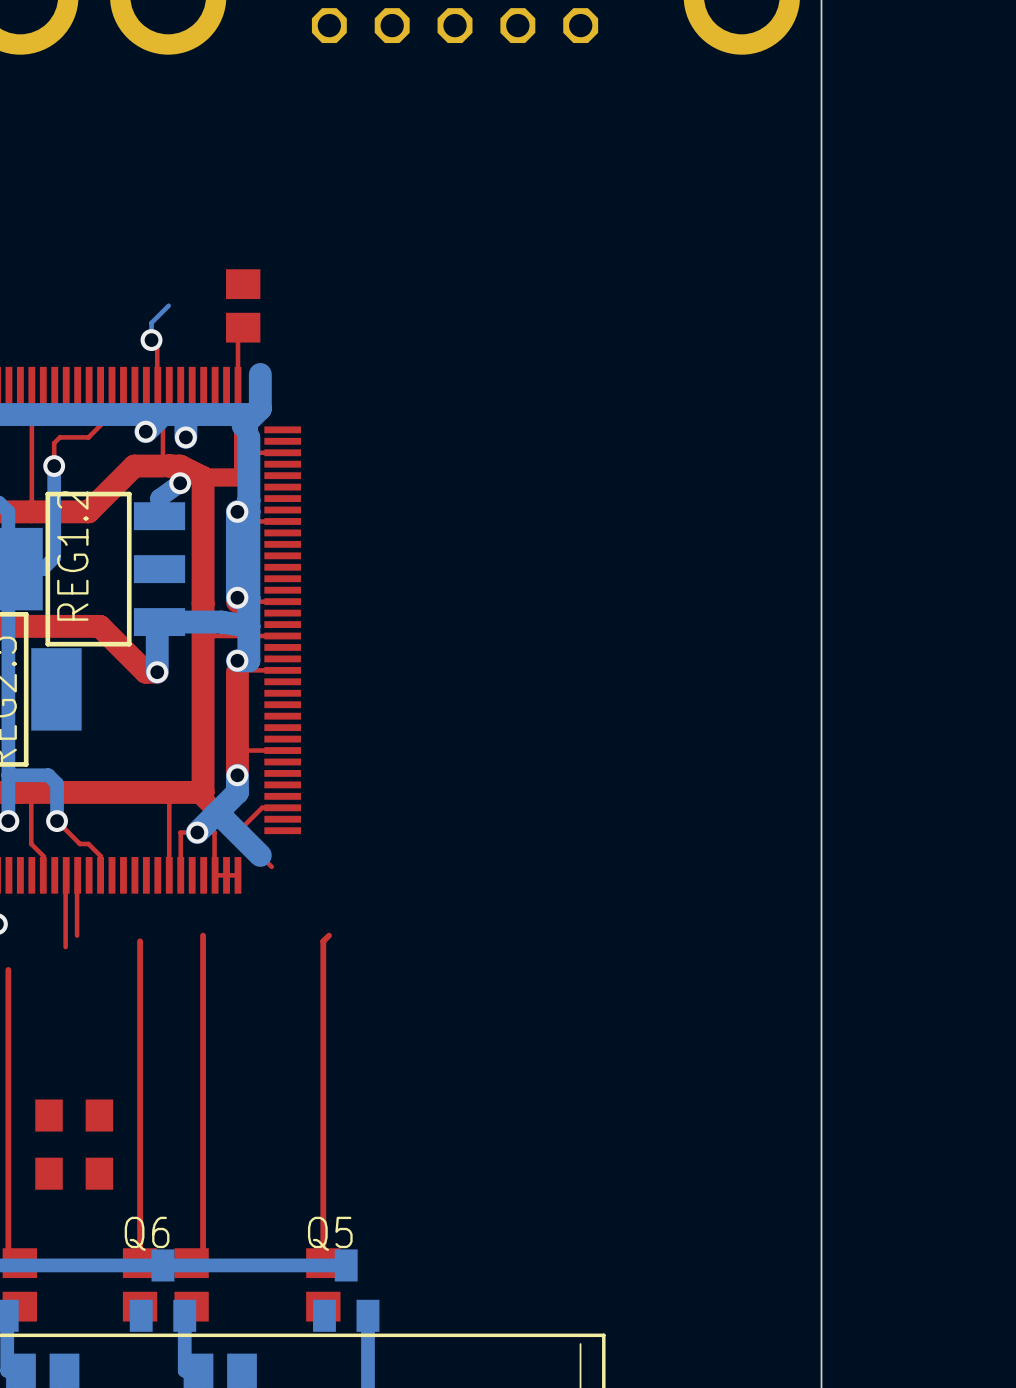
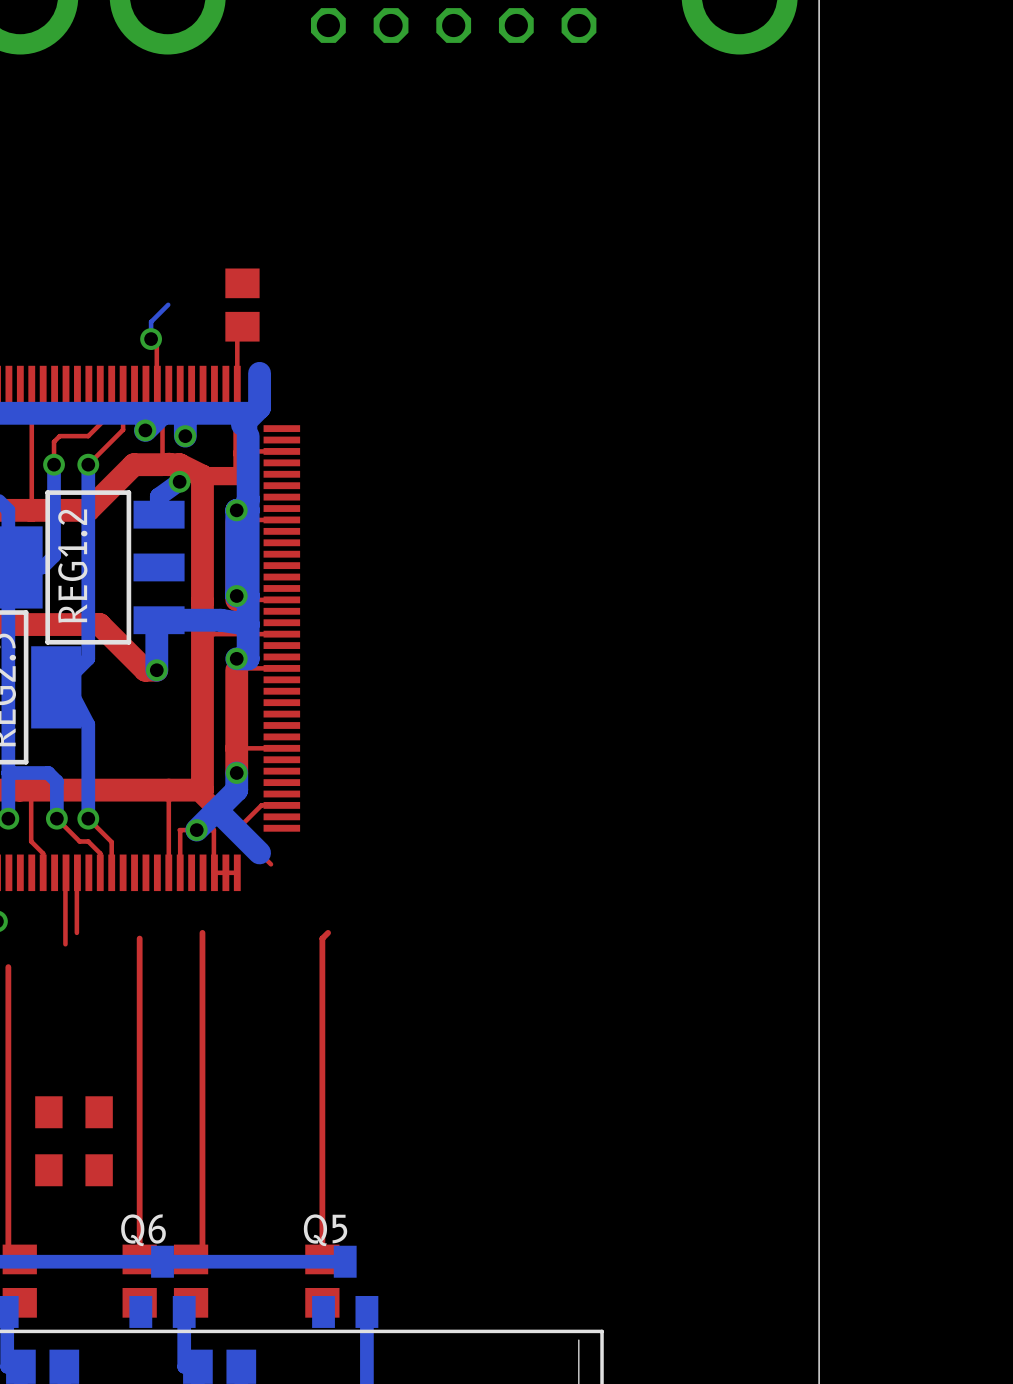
top track: none -> (123, 384) (123, 429) (88, 464)
bottom track: none -> (88, 464) (88, 658) (65, 681) (66, 682)
via: none -> (88, 464)
bottom track: none -> (66, 682) (88, 724) (88, 818)
top track: none -> (88, 818) (111, 842) (111, 872)
via: none -> (88, 818)

